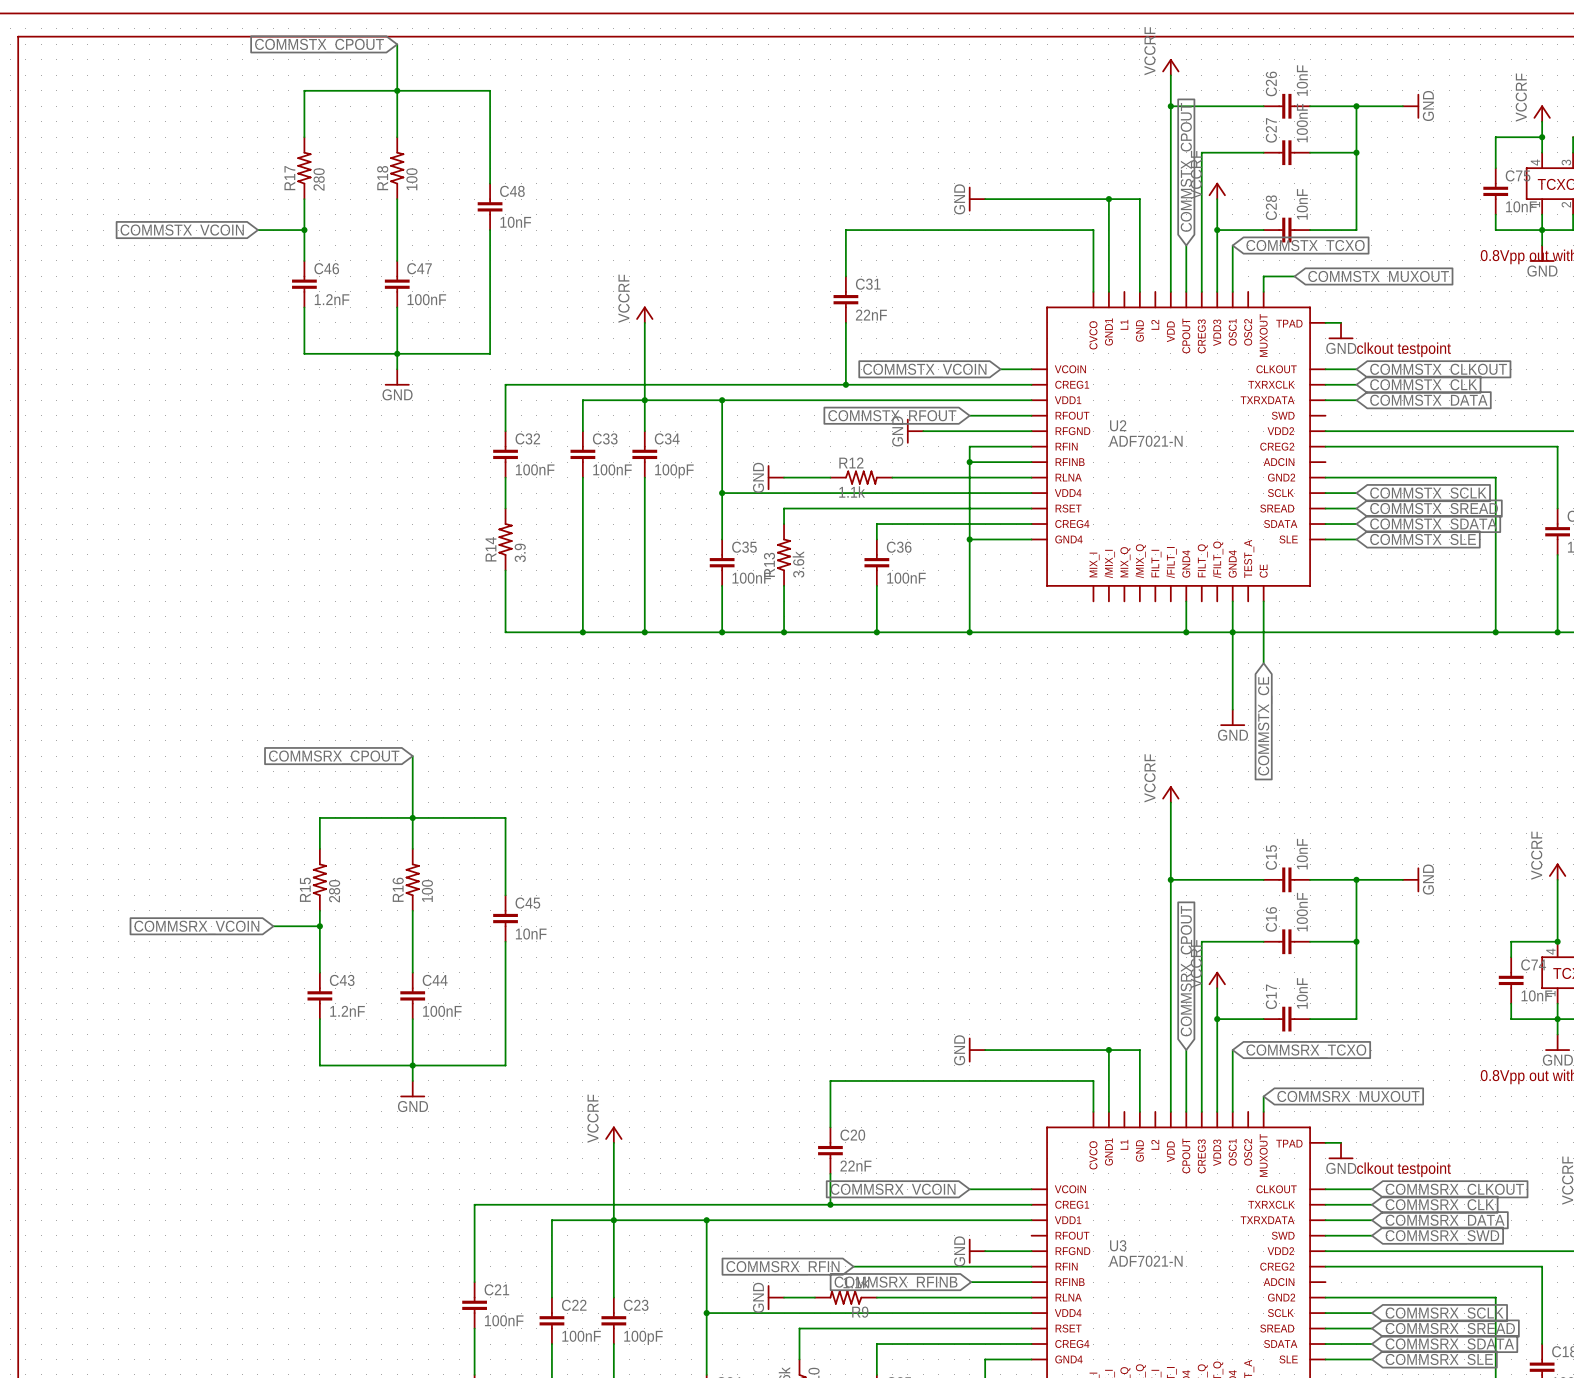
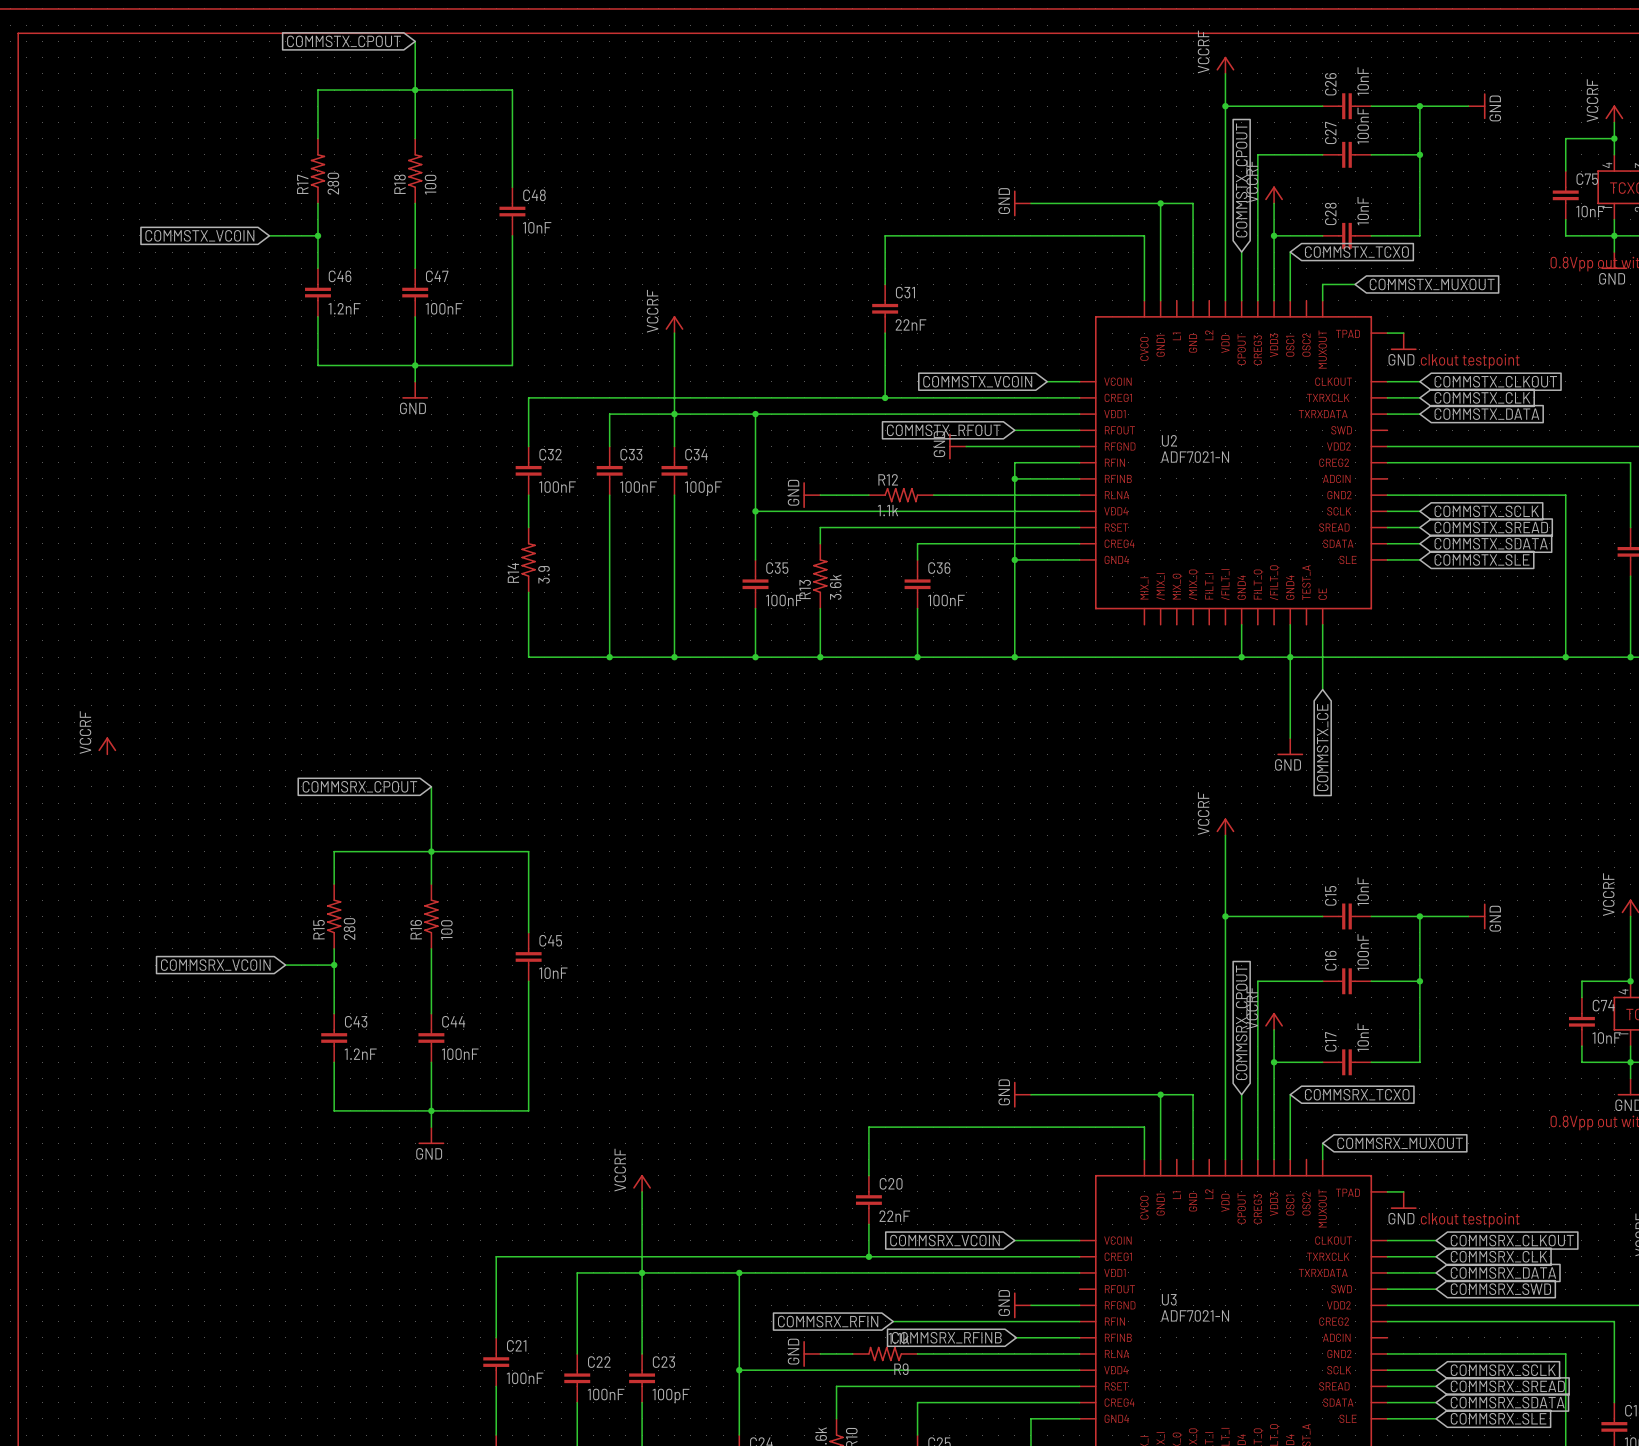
power symbol: none -> VCCRF (107, 745)

